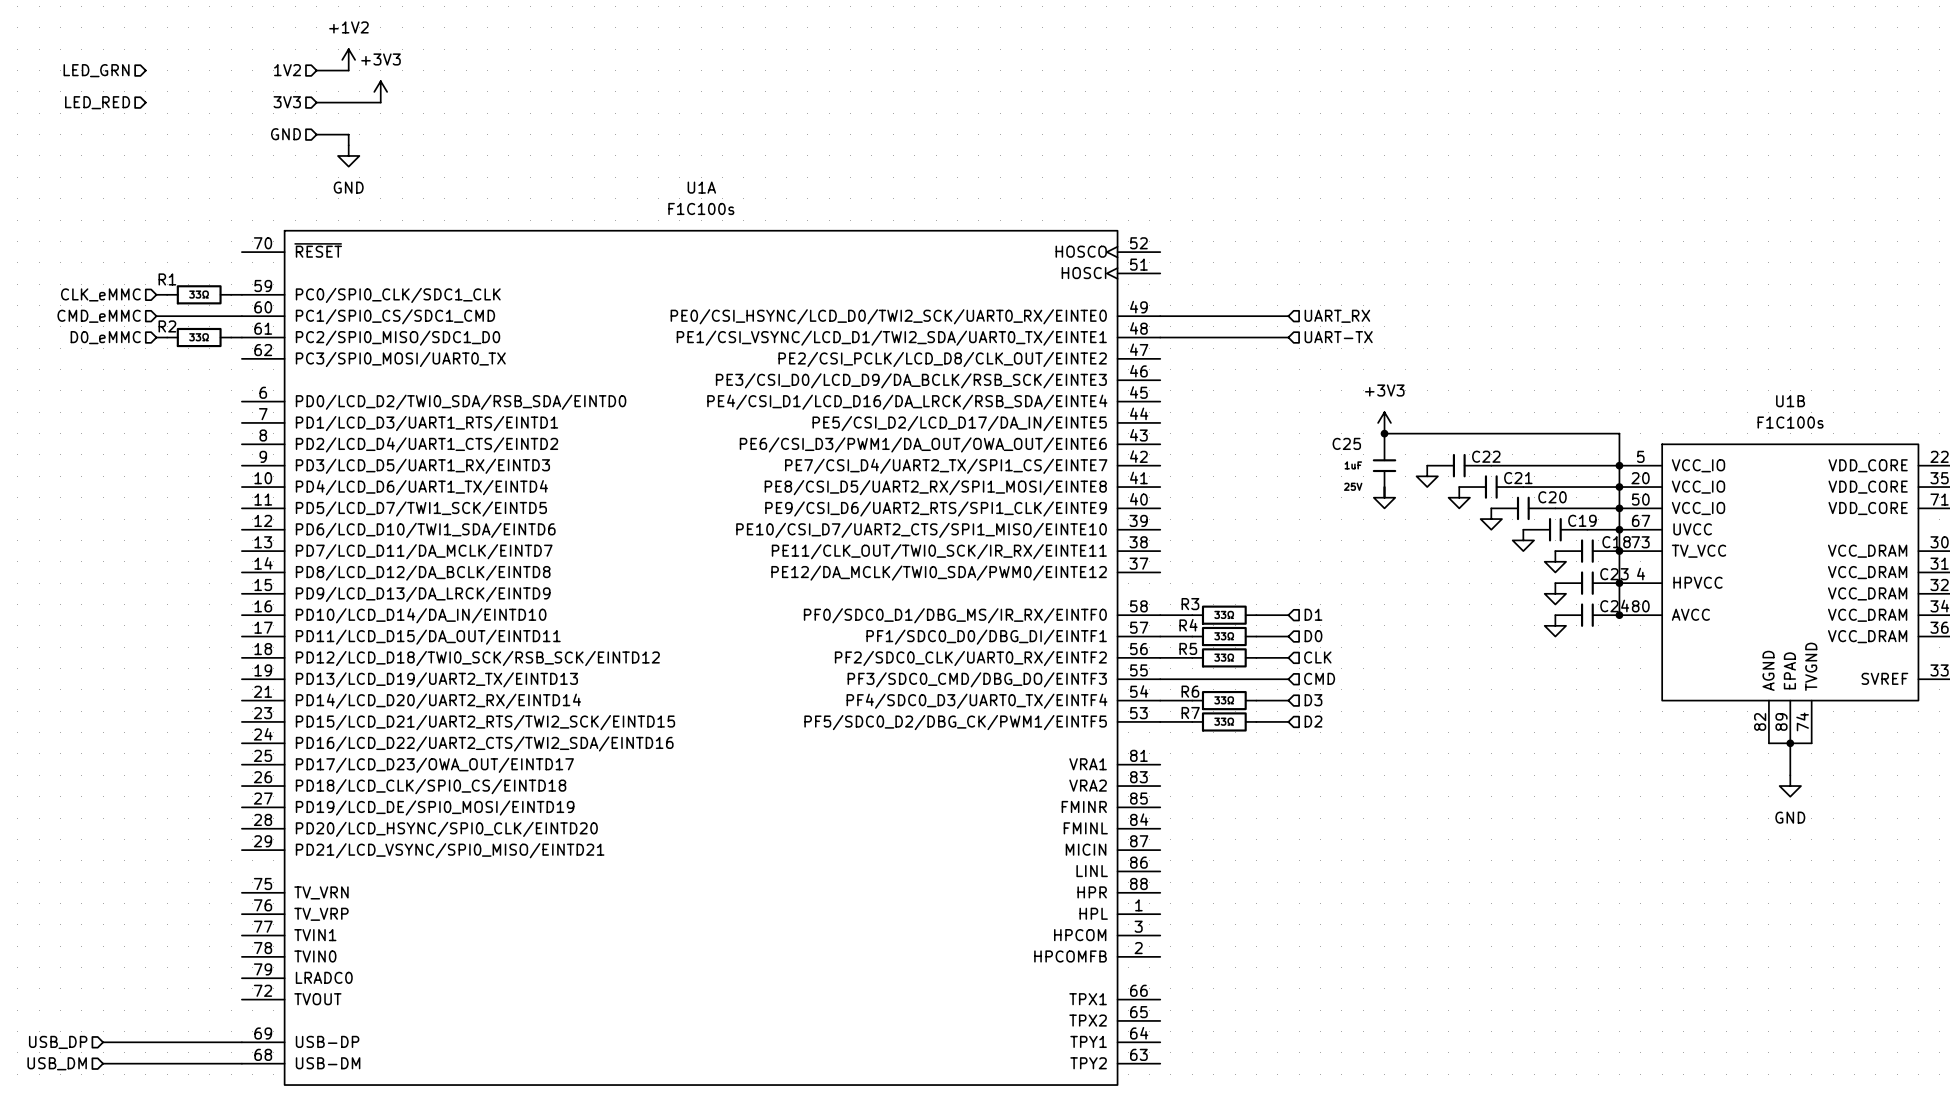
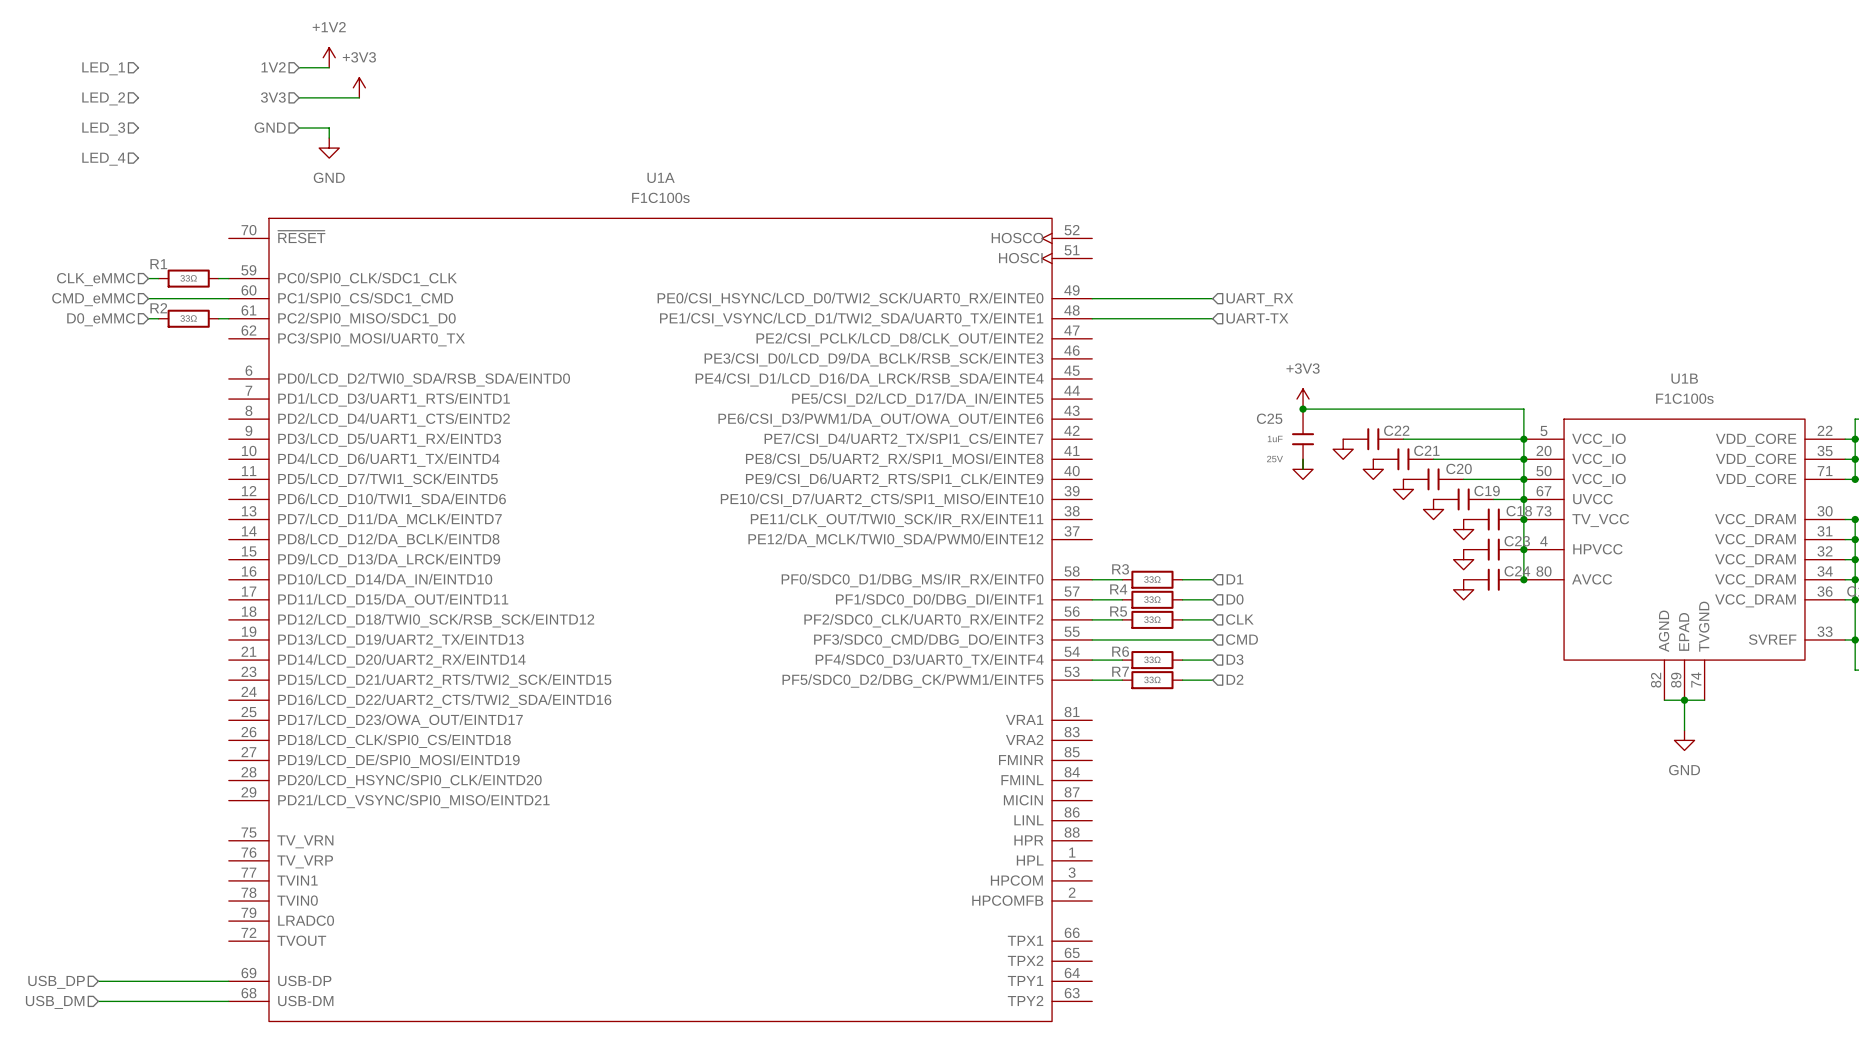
hierarchical label: LED_GRN (96, 70) -> LED_1 (103, 68)
hierarchical label: LED_RED (97, 102) -> LED_2 (103, 98)
hierarchical label: none -> LED_3 (103, 128)
hierarchical label: none -> LED_4 (103, 159)

